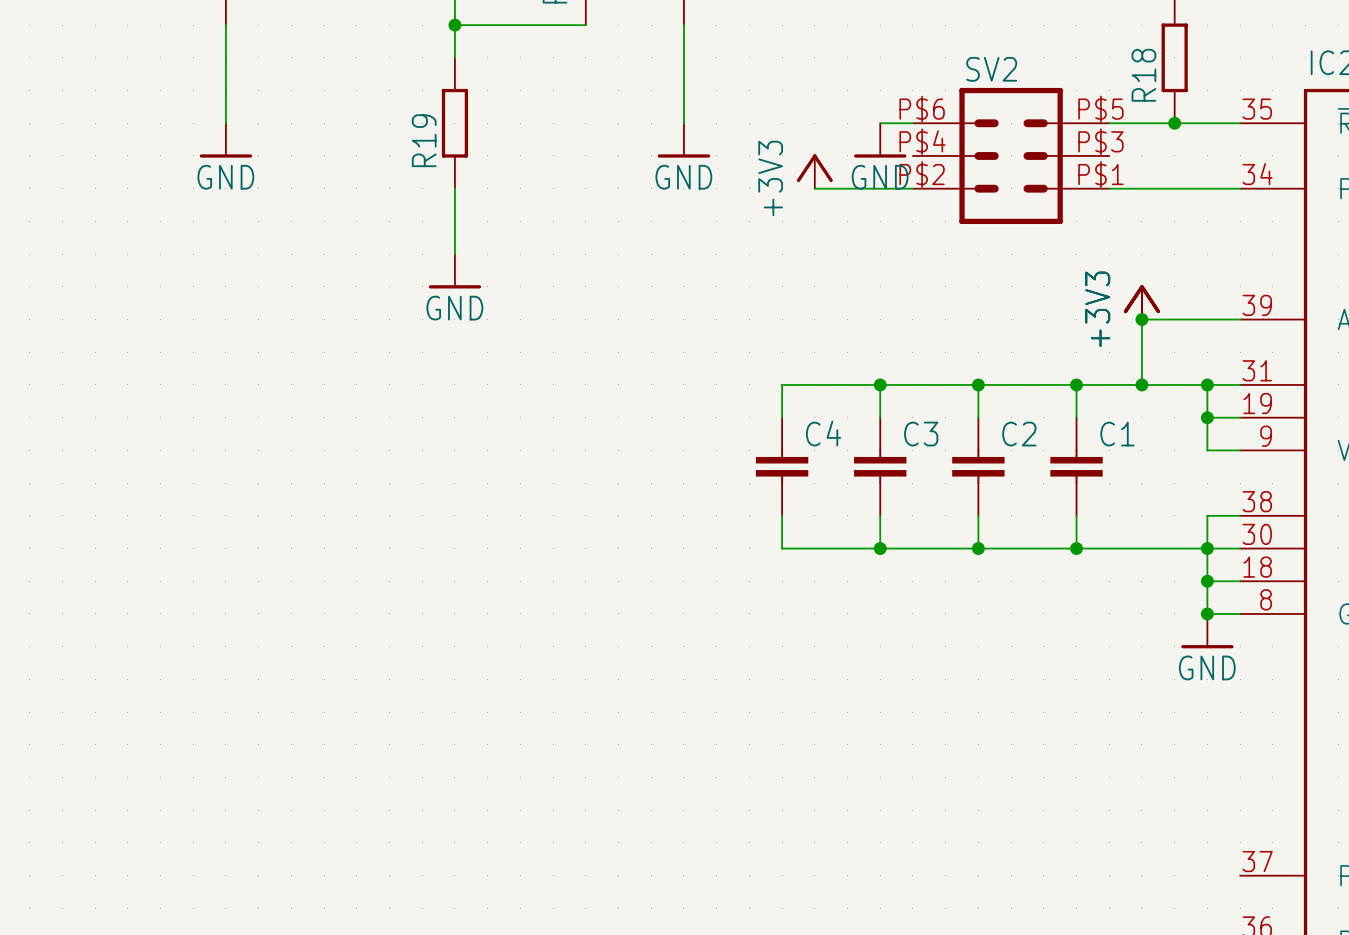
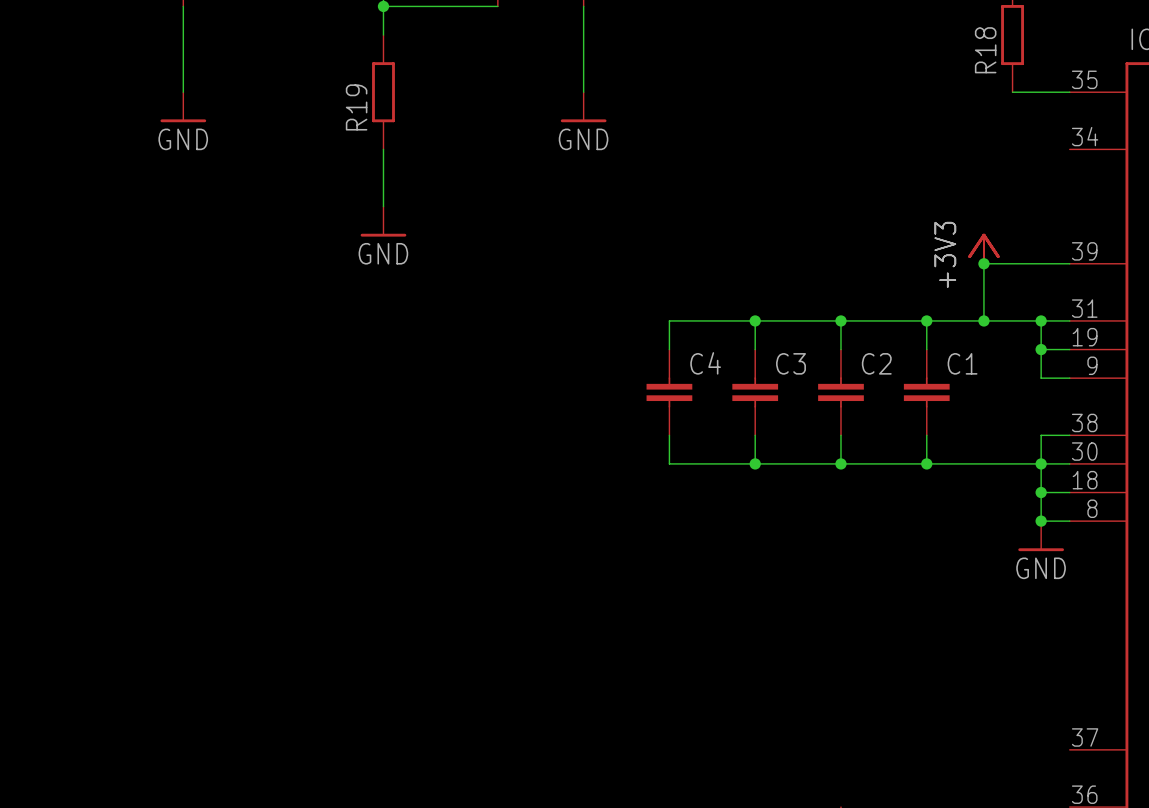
wire: (880, 123) (912, 123) -> none
wire: (1109, 123) (1174, 123) -> none
junction: (1174, 123) -> none
power symbol: GND (880, 140) -> none
SV2: (1011, 155) -> none
power symbol: +3V3 (814, 171) -> none
wire: (814, 188) (912, 188) -> none
wire: (1109, 188) (1240, 188) -> none

